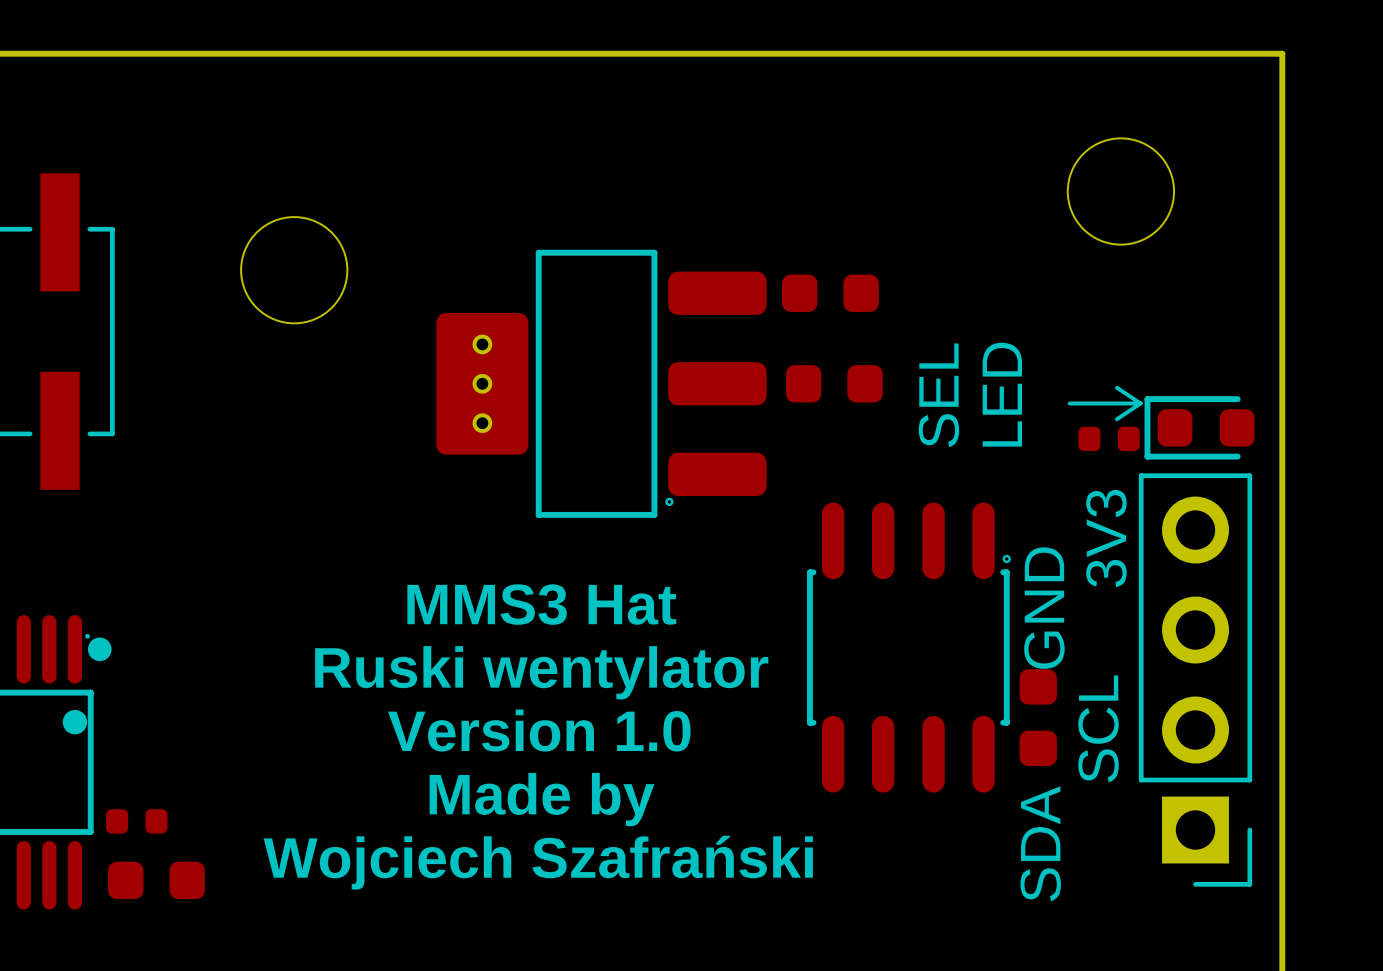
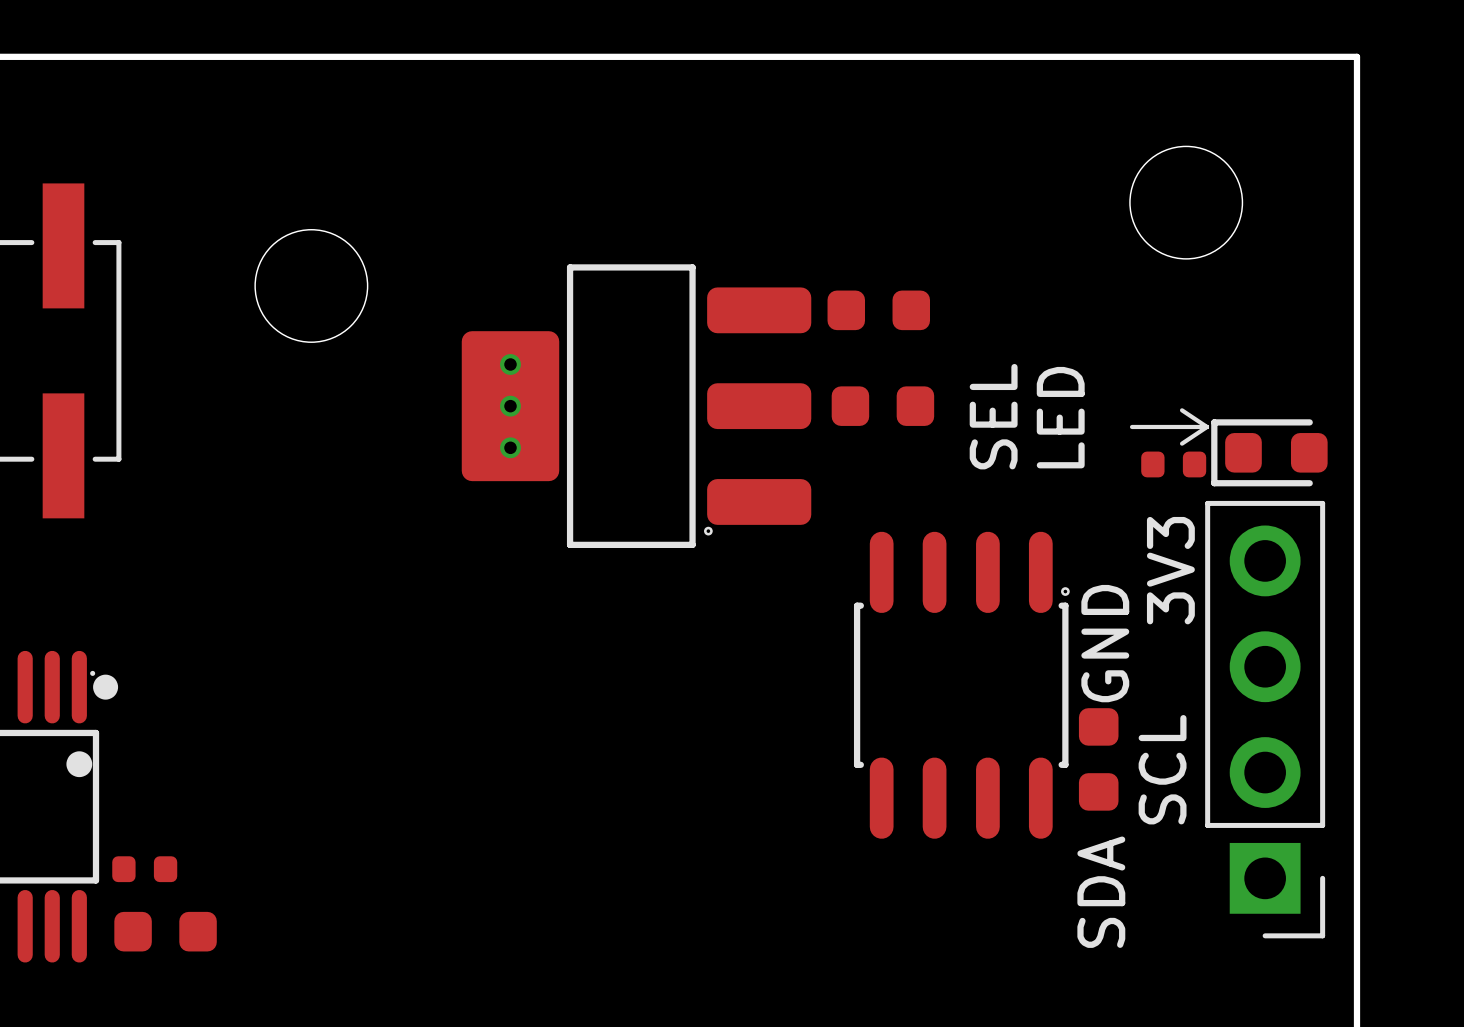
text: MMS3 Hat (541, 604) -> none
text: Ruski wentylator (541, 672) -> none
text: Version 1.0 (539, 730) -> none
text: Made by (542, 799) -> none
text: Wojciech Szafrański (538, 862) -> none

